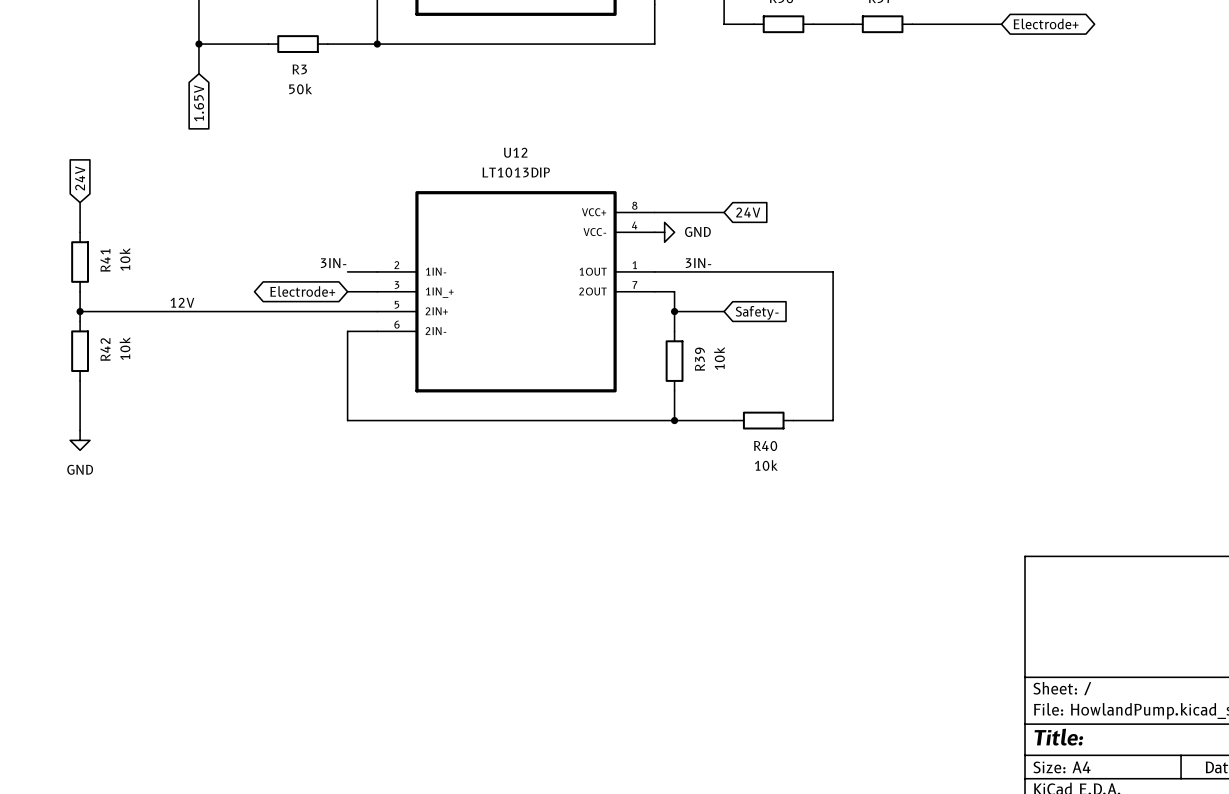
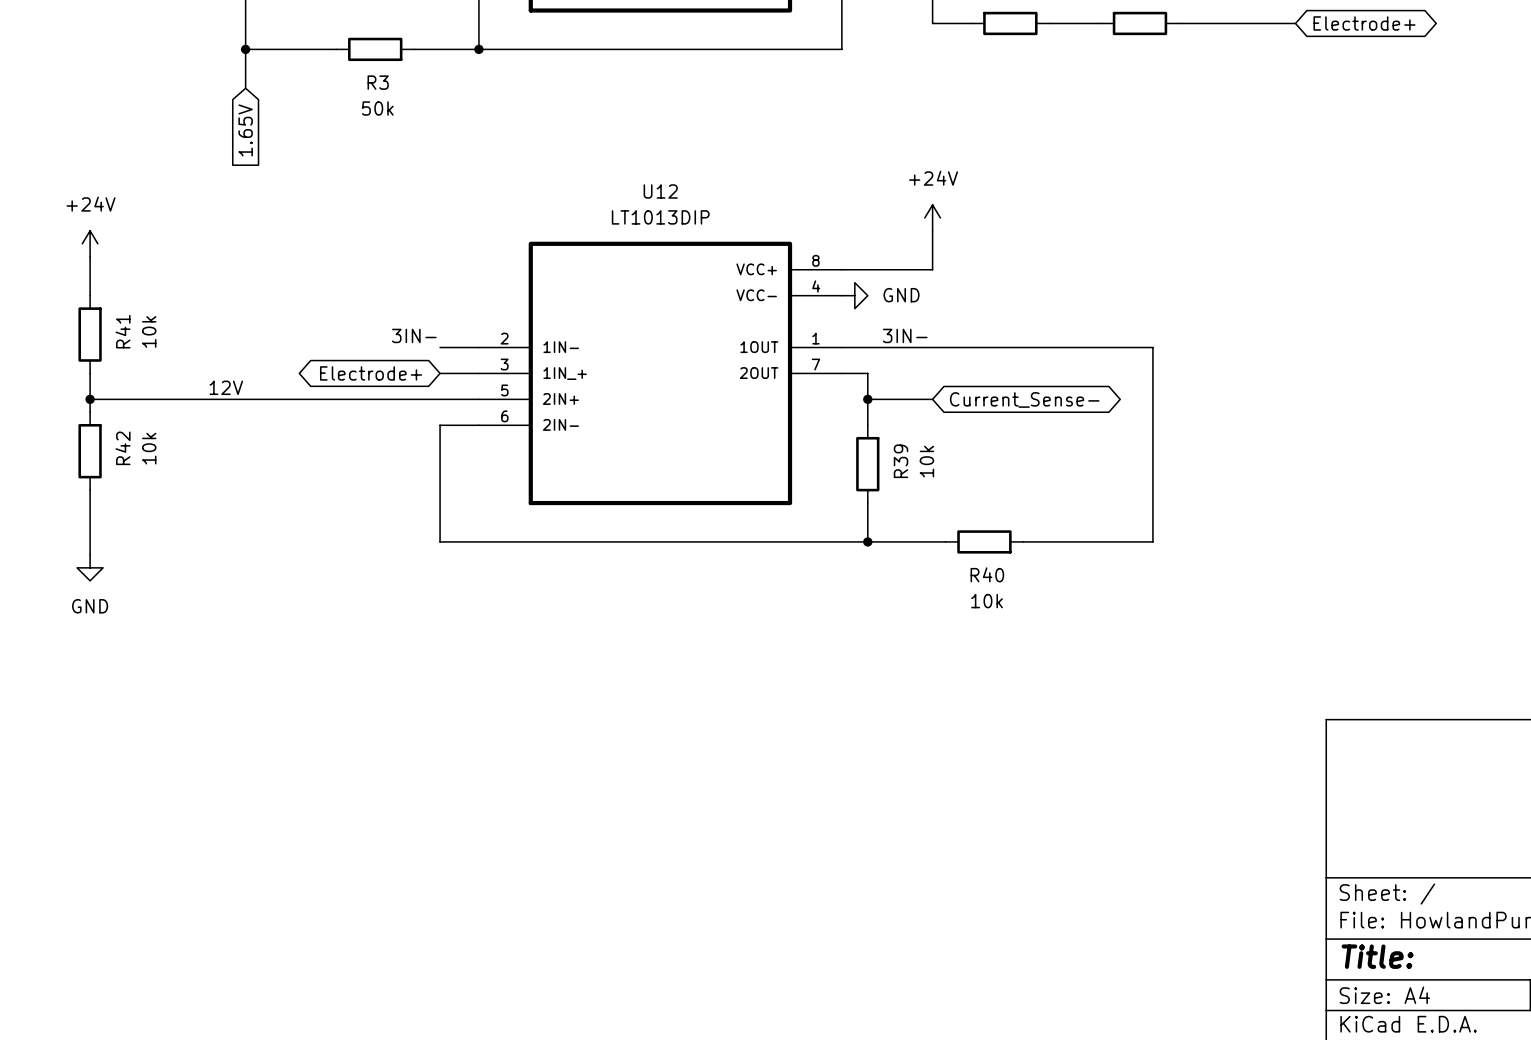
power symbol: none -> +24V (932, 217)
global label: 24V (80, 178) -> none
wire: none -> (932, 230) (932, 269)
power symbol: none -> +24V (90, 243)
global label: 24V (748, 212) -> none
wire: (833, 271) (833, 420) -> (1075, 347) (1152, 347) (1152, 541) (1075, 541)
global label shape: input (757, 312) -> bidirectional (1024, 399)
global label: Safety- (757, 312) -> Current_Sense- (1024, 399)

